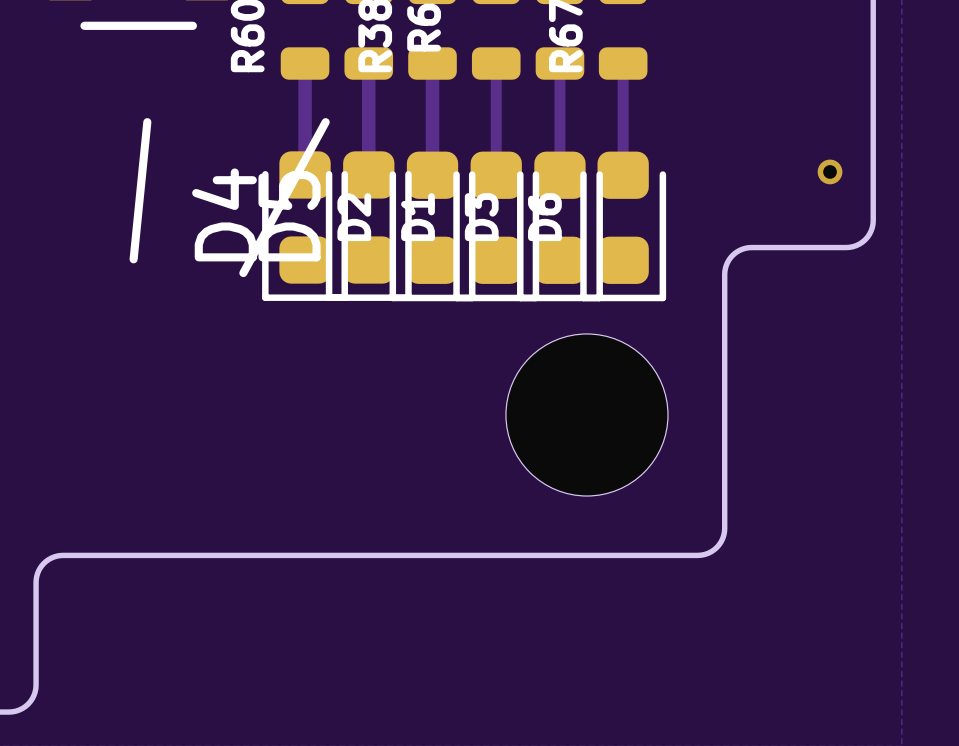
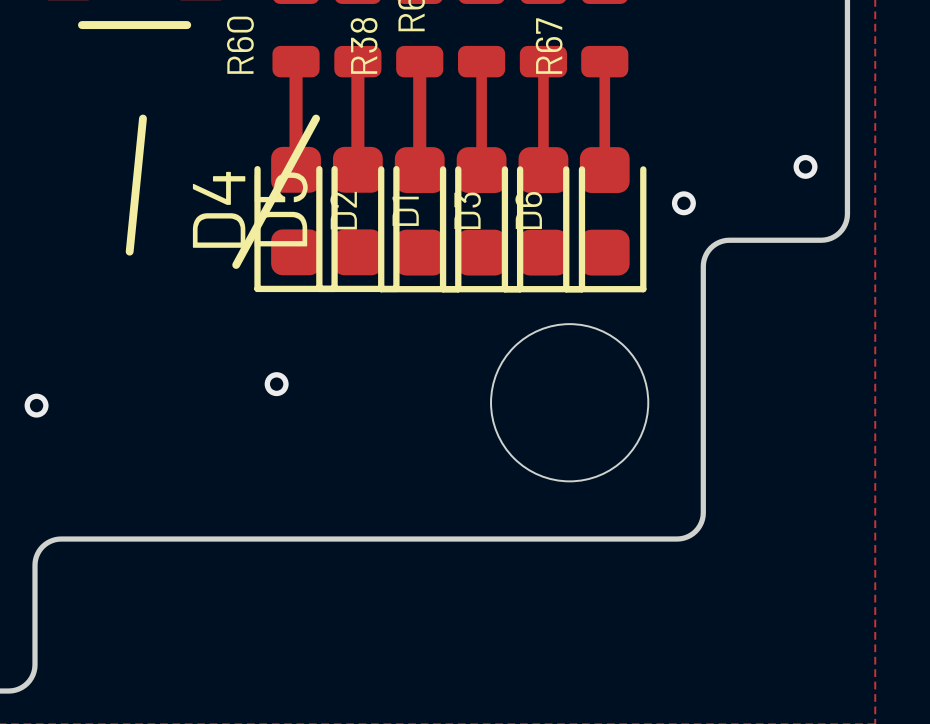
via: none -> (683, 203)
via: none -> (276, 384)
via: none -> (36, 405)

